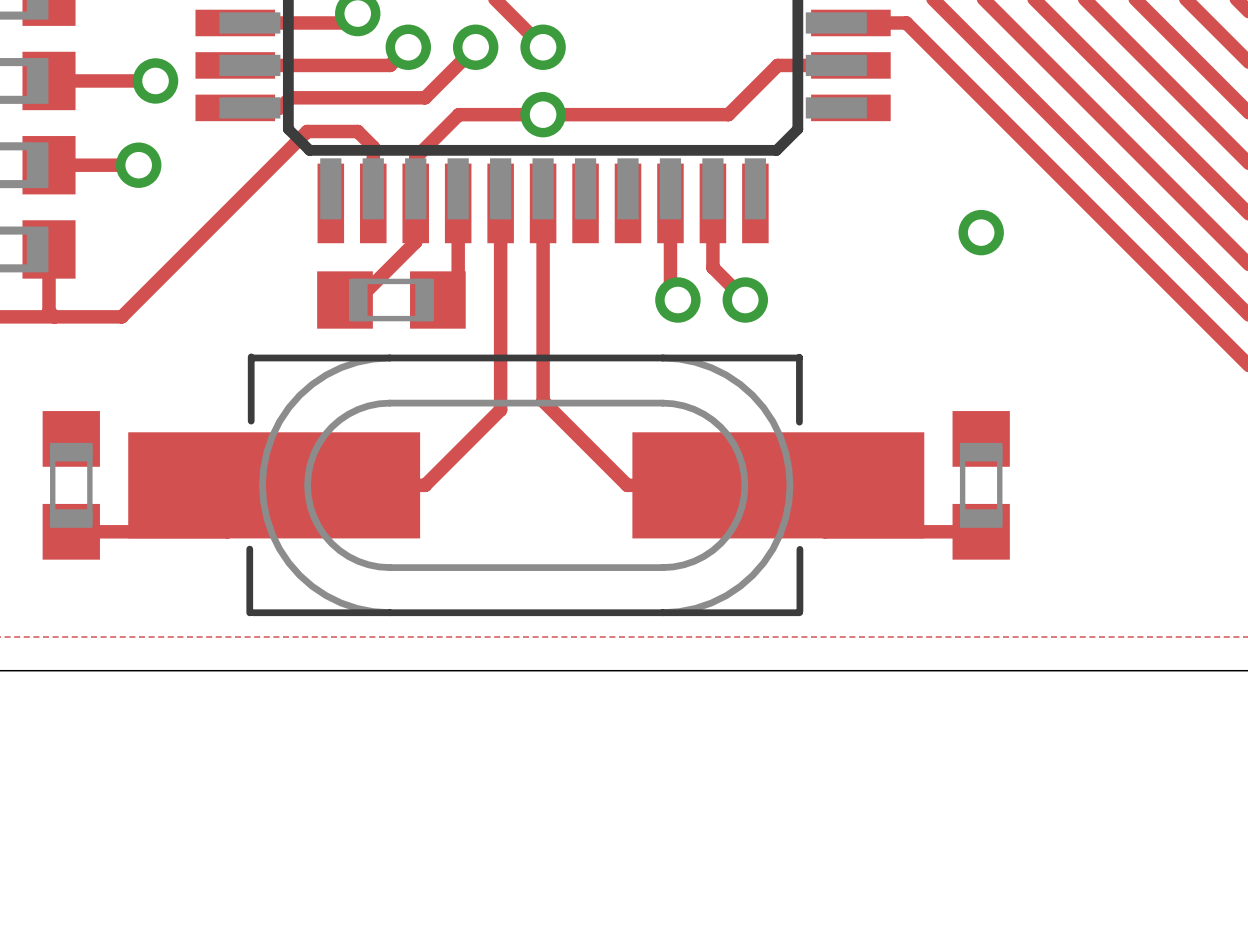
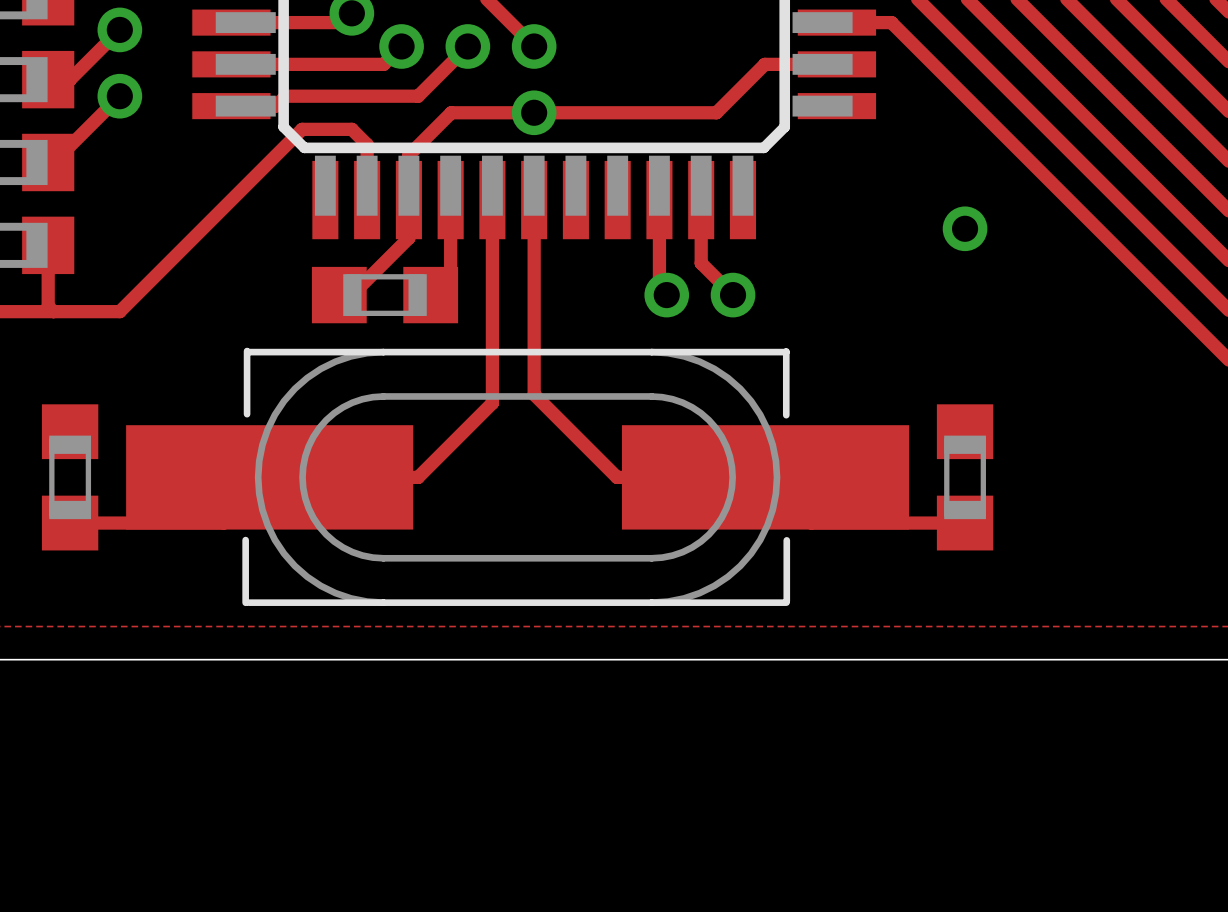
via: none -> (119, 29)
track: (71, 80) (155, 80) -> (70, 79) (119, 29)
via position: (155, 80) -> (119, 96)
track: (54, 165) (138, 165) -> (53, 162) (119, 96)
via: (138, 165) -> none

